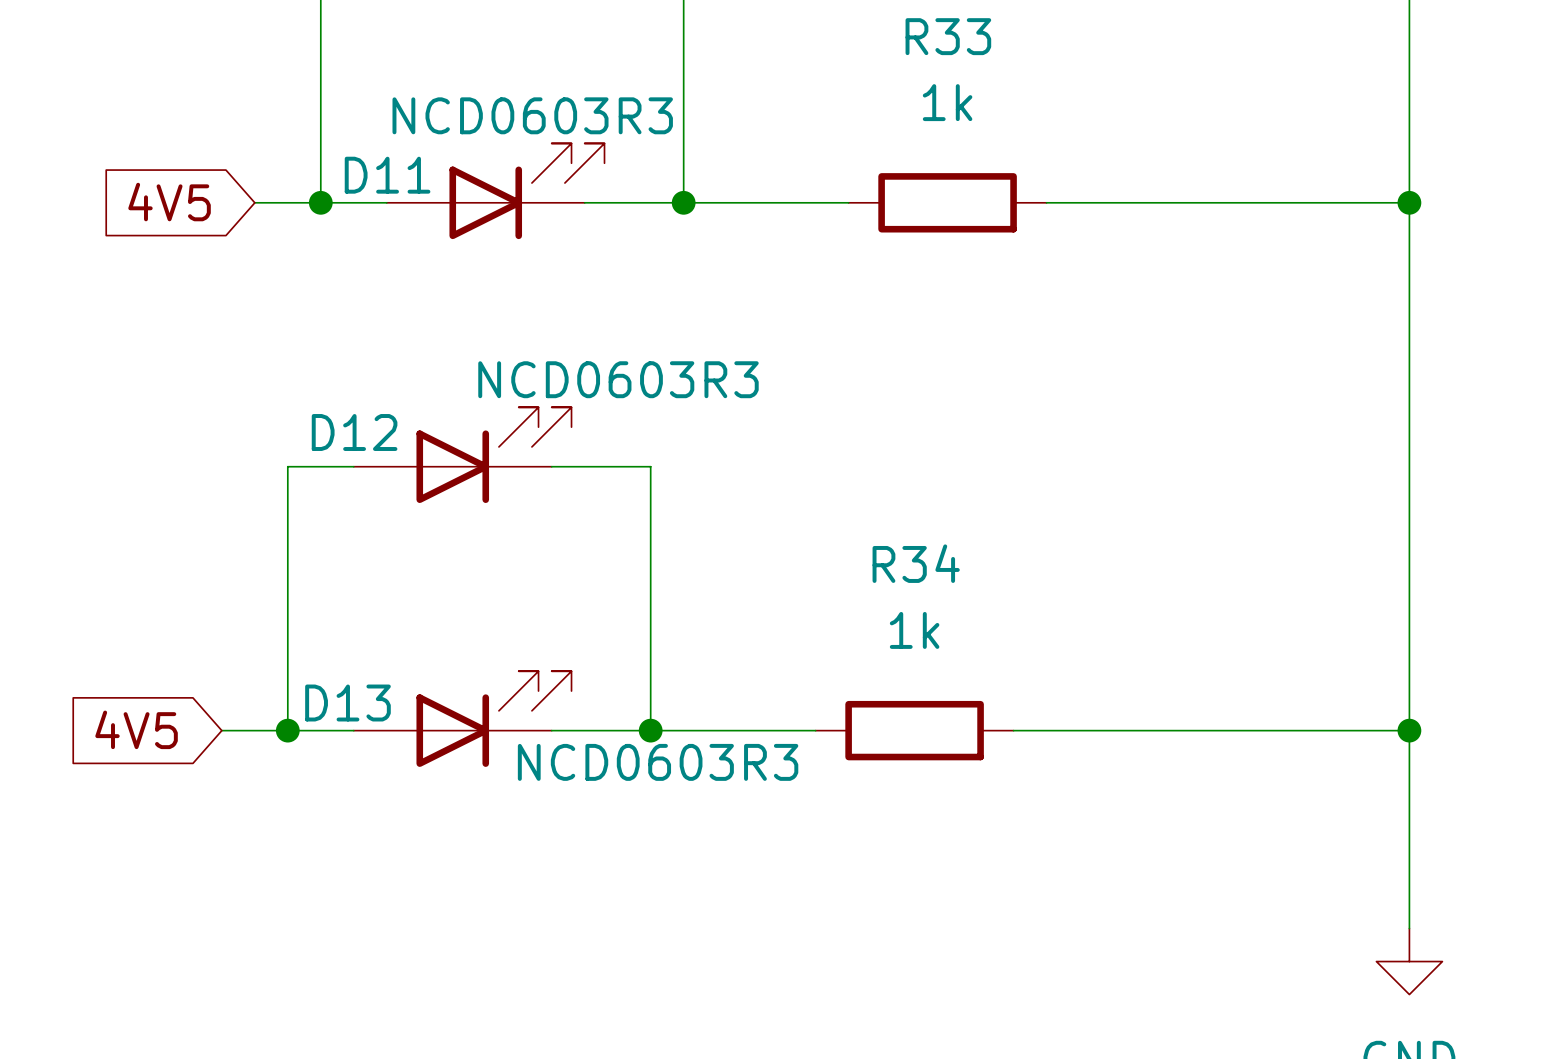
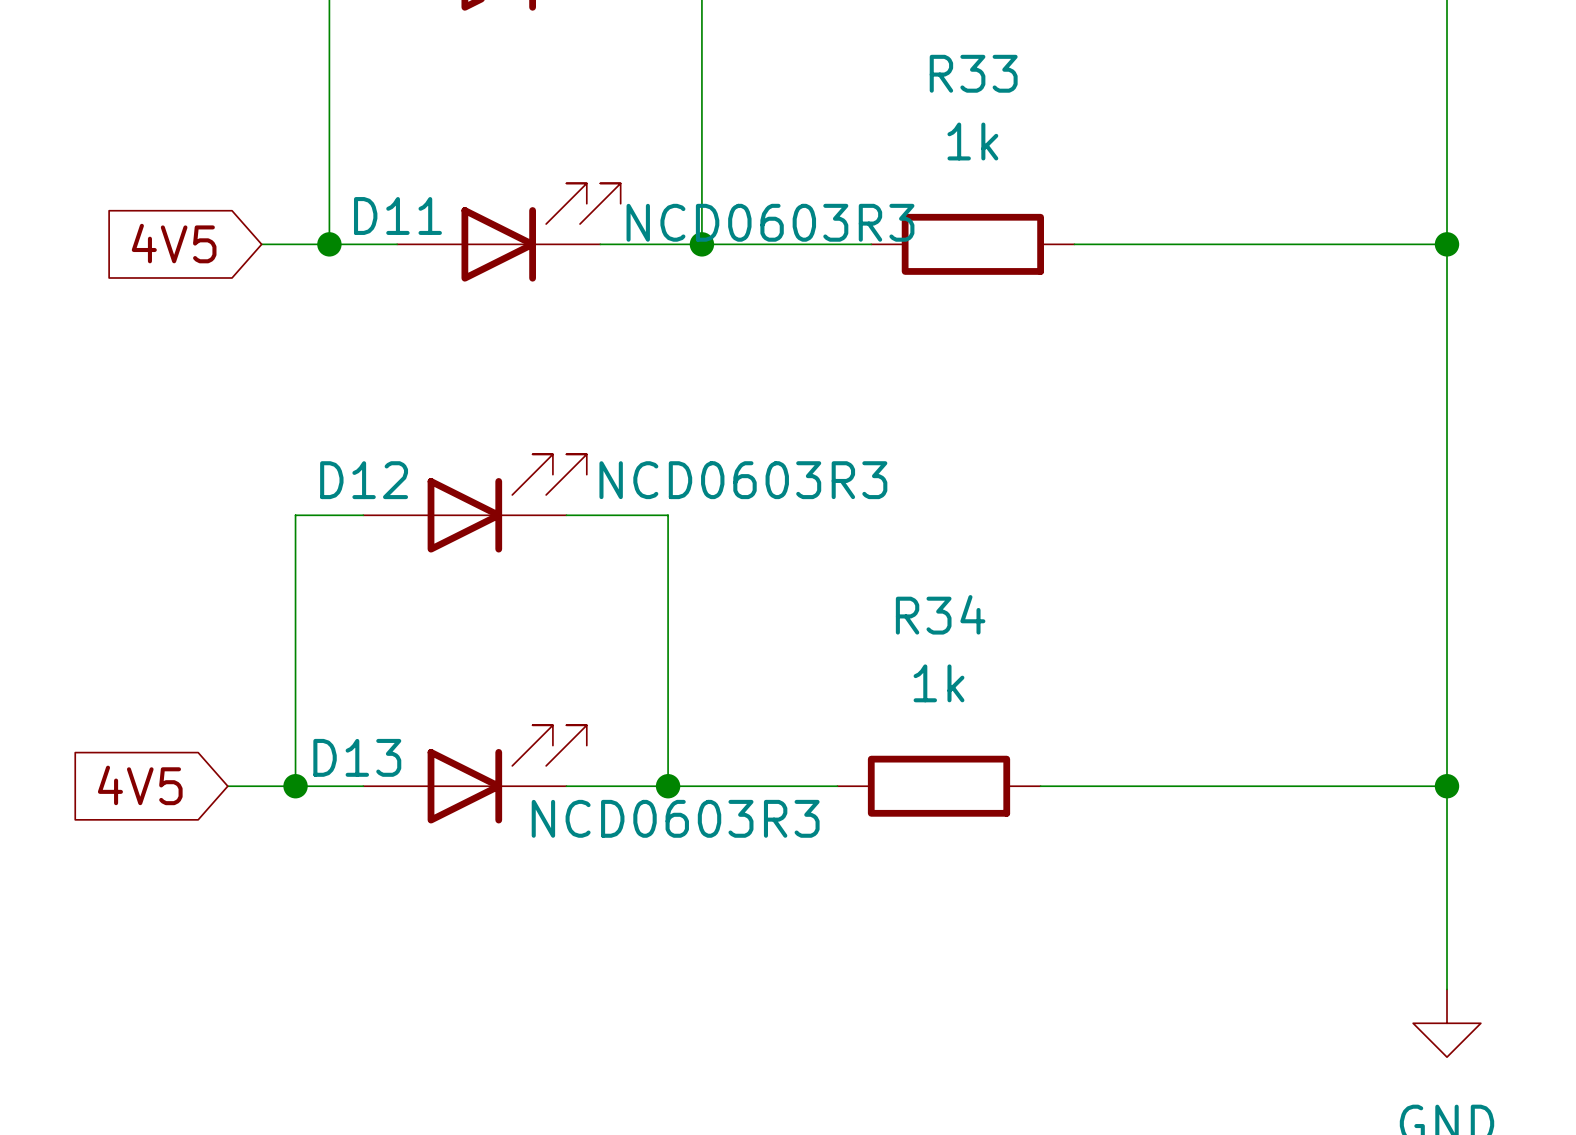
D11 value position: NCD0603R3 (532, 115) -> NCD0603R3 (770, 222)
D12 value position: NCD0603R3 (618, 379) -> NCD0603R3 (743, 480)

